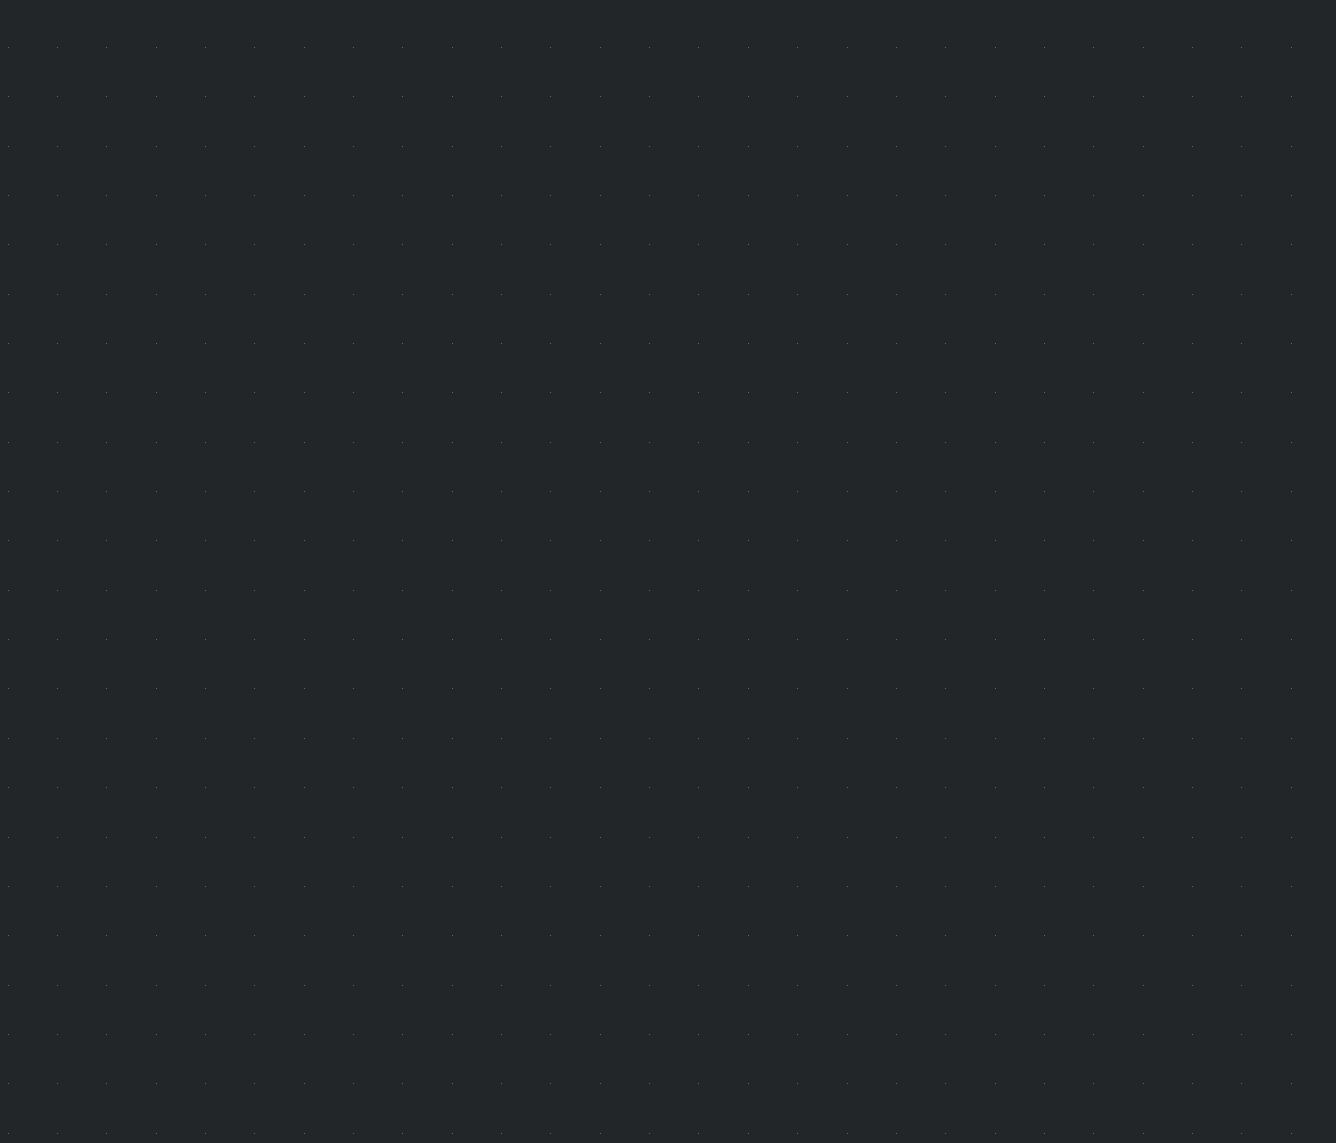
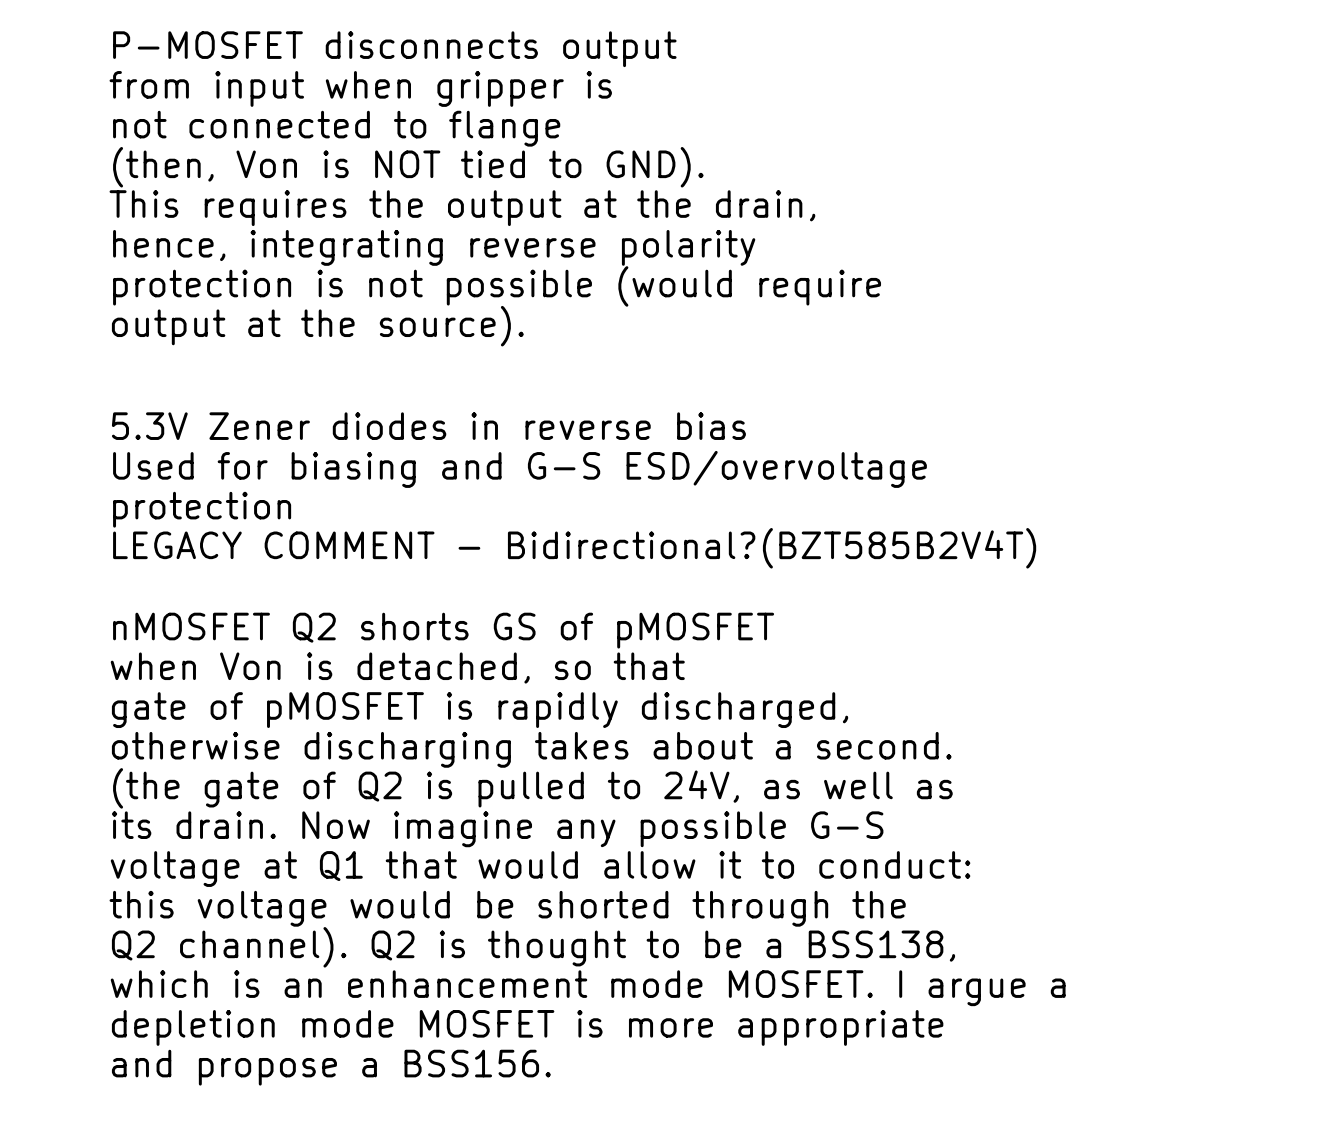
text: none -> P-MOSFET disconnects output (394, 49)
text: none -> from input when gripper is (360, 88)
text: none -> not connected to flange (336, 128)
text: none -> (then, Von is NOT tied to GND). (408, 167)
text: none -> This requires the output at the drain, (462, 208)
text: none -> hence, integrating reverse polarity (434, 247)
text: none -> protection is not possible (would require (497, 286)
text: none -> output at the source). (317, 326)
text: none -> 5.3V Zener diodes in reverse bias (428, 426)
text: none -> Used for biasing and G-S ESD/overvoltage (519, 469)
text: none -> protection (202, 509)
text: none -> LEGACY COMMENT - Bidirectional?(BZT585B2V4T) (574, 548)
text: none -> nMOSFET Q2 shorts GS of pMOSFET (443, 630)
text: none -> when Von is detached, so that (397, 668)
text: none -> gate of pMOSFET is rapidly discharged, (480, 710)
text: none -> otherwise discharging takes about a second. (531, 749)
text: none -> (the gate of Q2 is pulled to 24V, as well as (532, 788)
text: none -> its drain. Now imagine any possible G-S (497, 829)
text: none -> voltage at Q1 that would allow it to conduct: (540, 869)
text: none -> this voltage would be shorted through the (507, 908)
text: none -> Q2 channel). Q2 is thought to be a BSS138, (533, 947)
text: none -> which is an enhancement mode MOSFET. I argue a (588, 988)
text: none -> depletion mode MOSFET is more appropriate (527, 1027)
text: none -> and propose a BSS156. (331, 1067)

